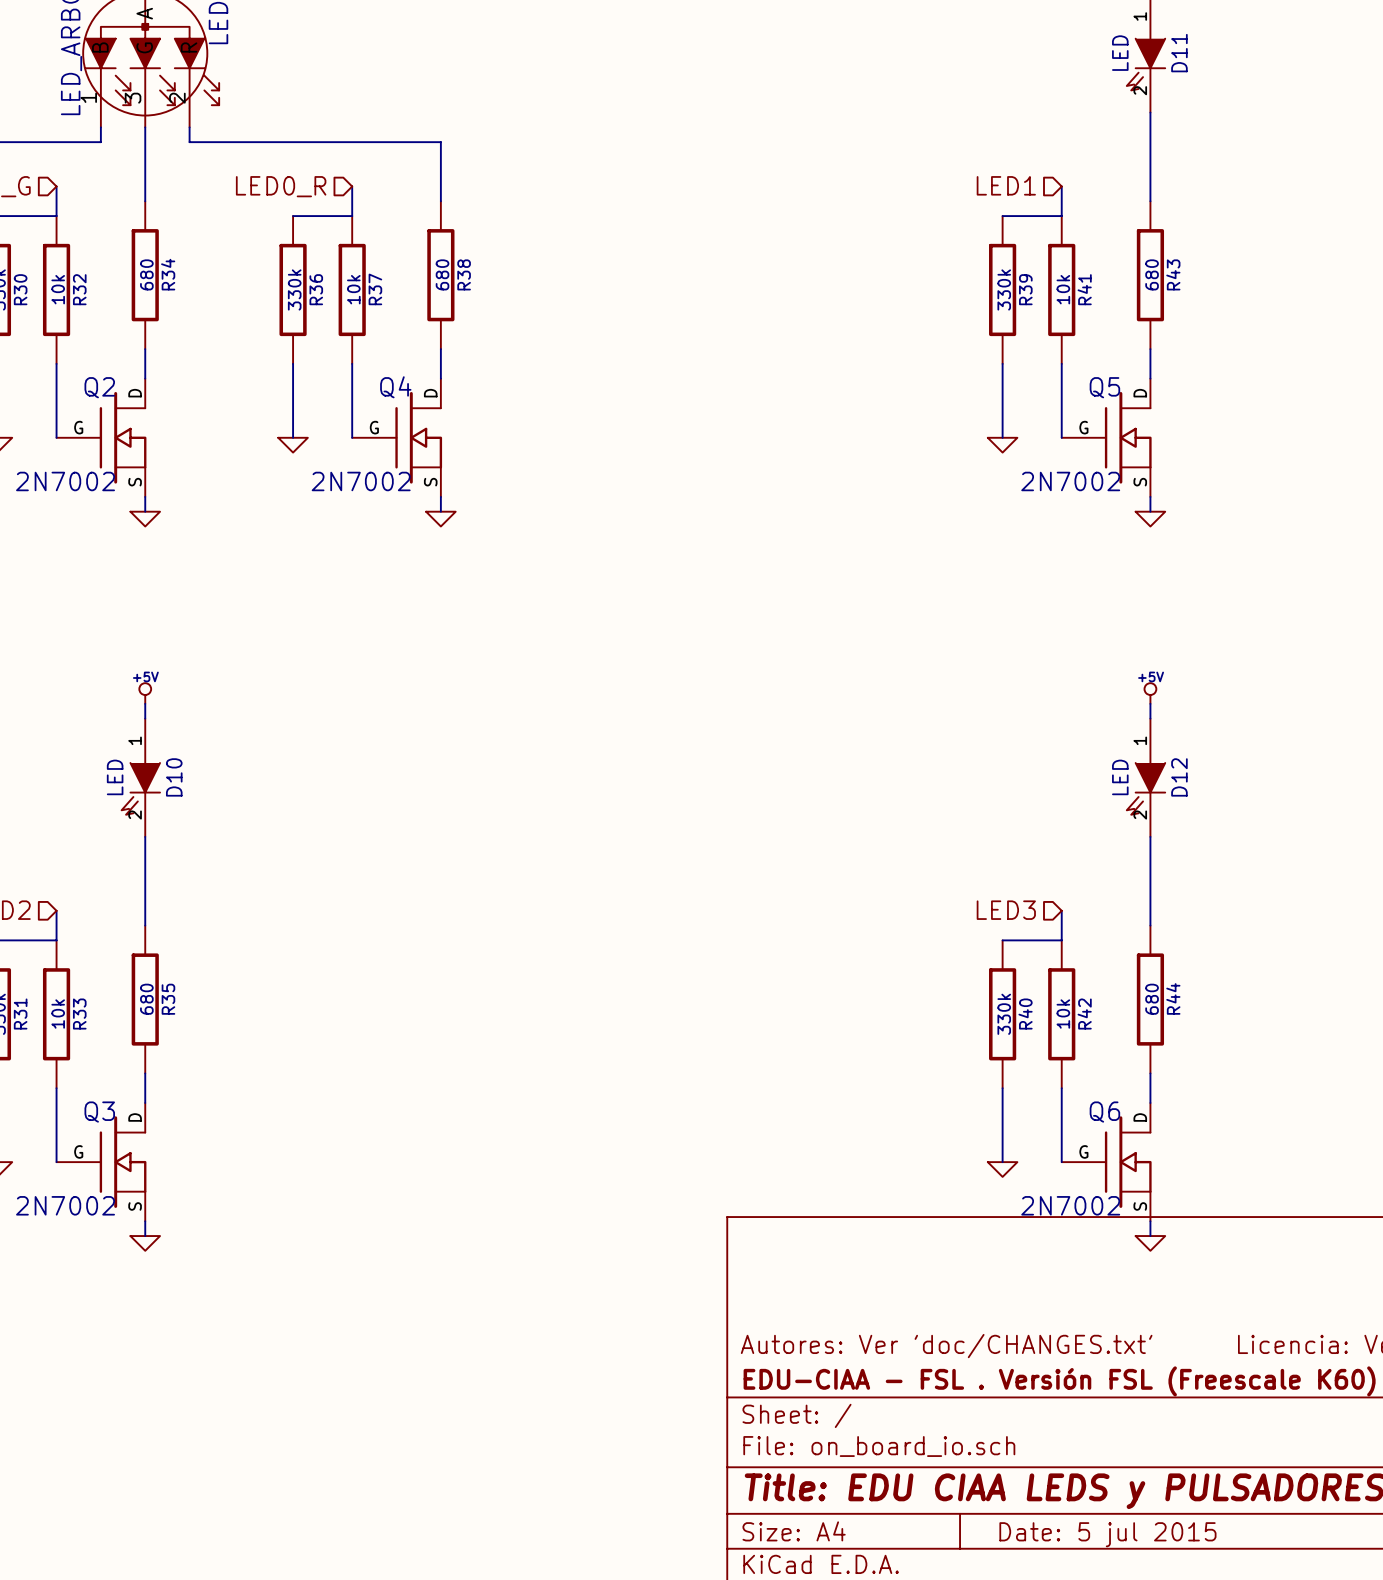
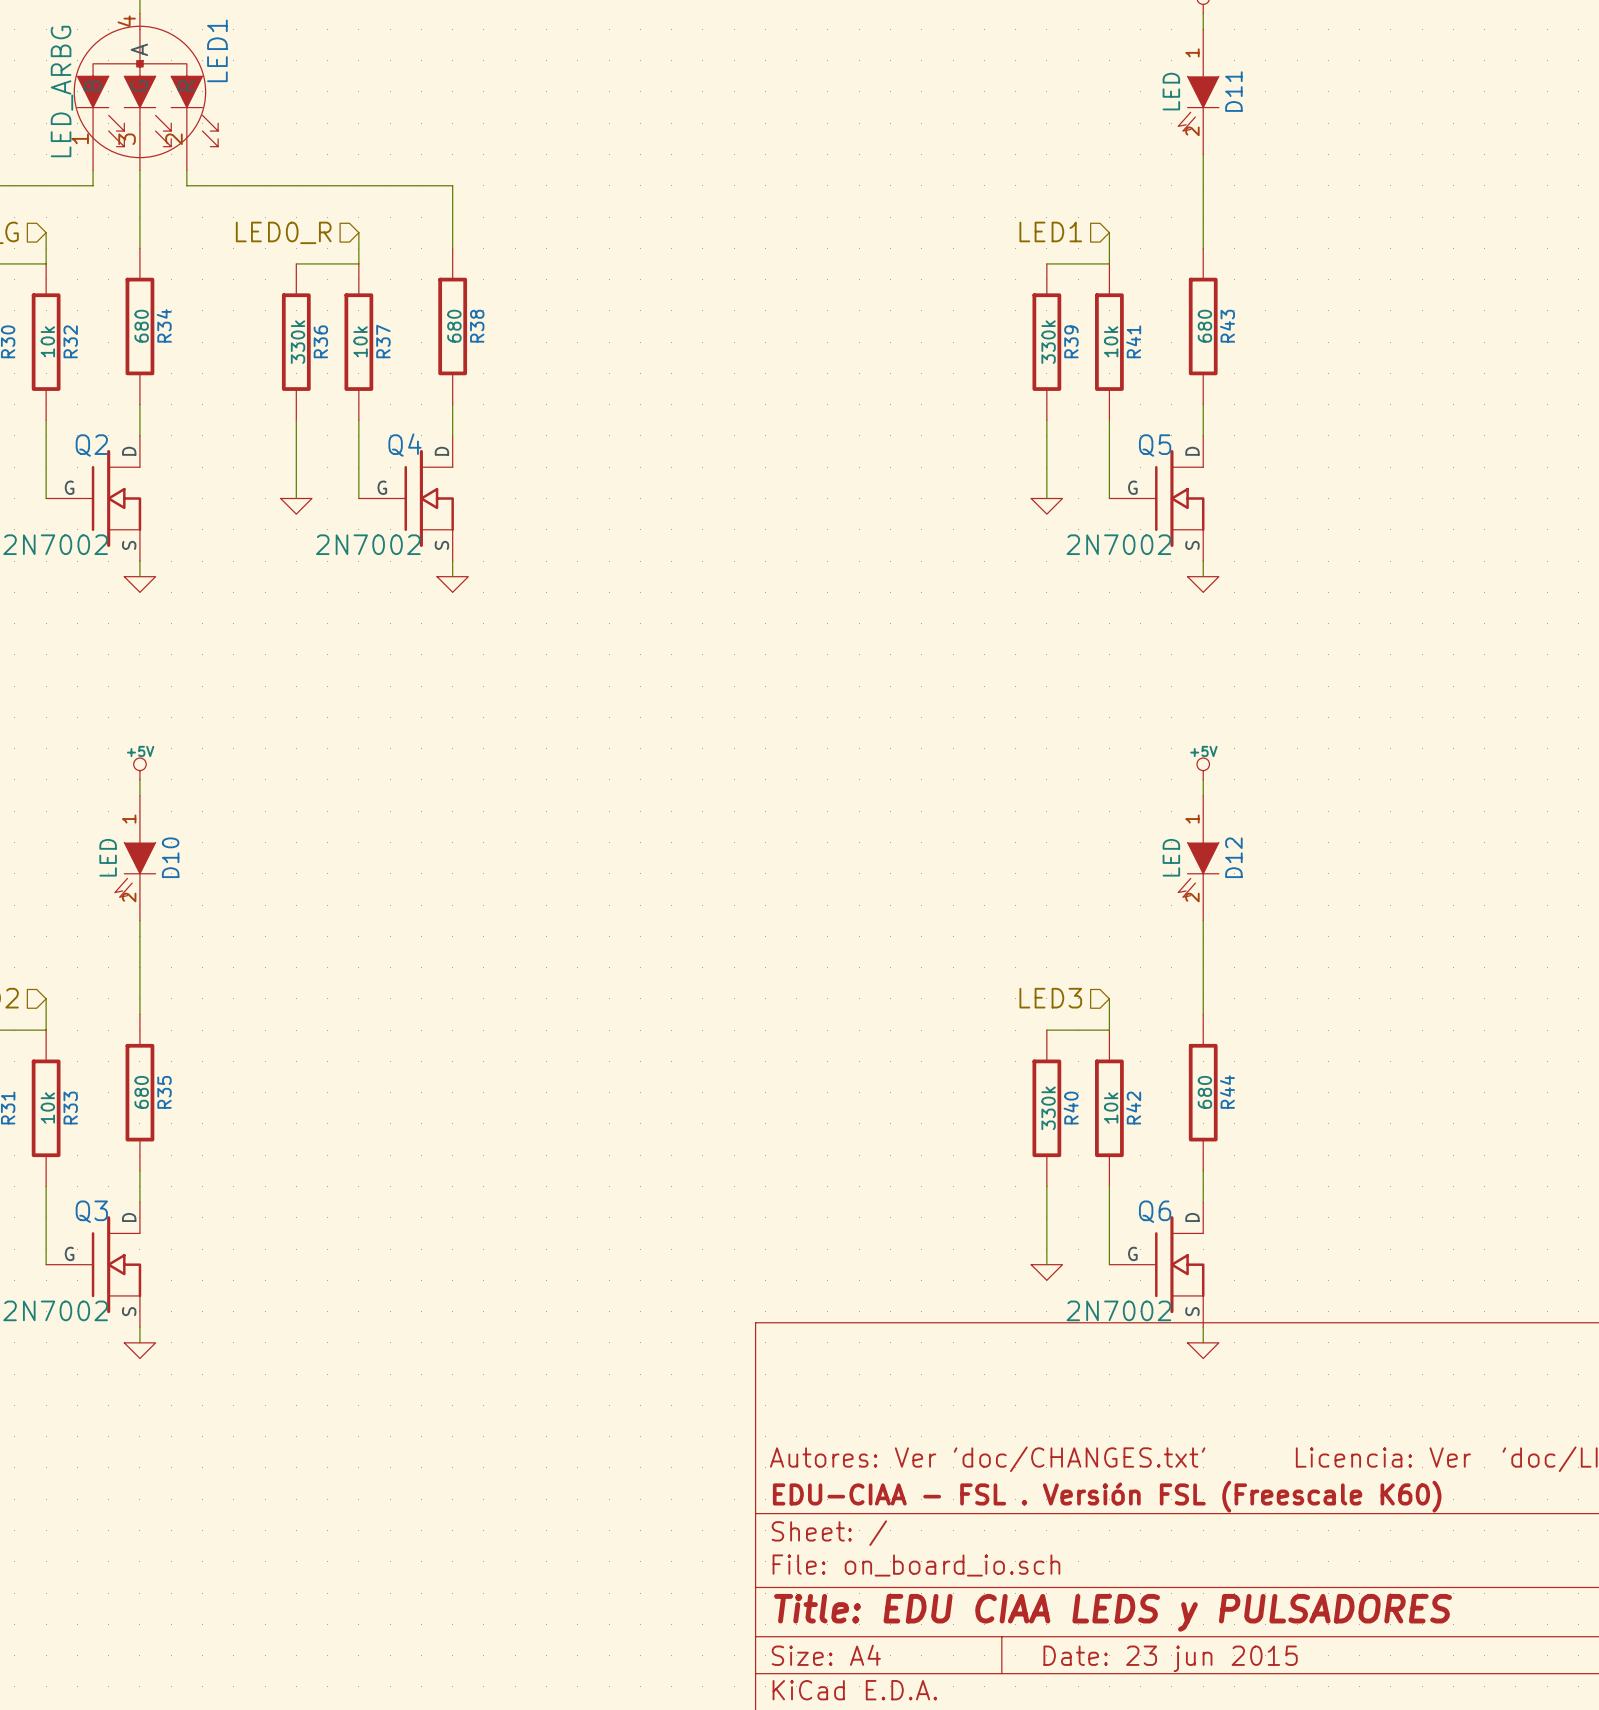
title block: Date: 5 jul 2015 (1107, 1534) -> Date: 23 jun 2015 (1170, 1658)

